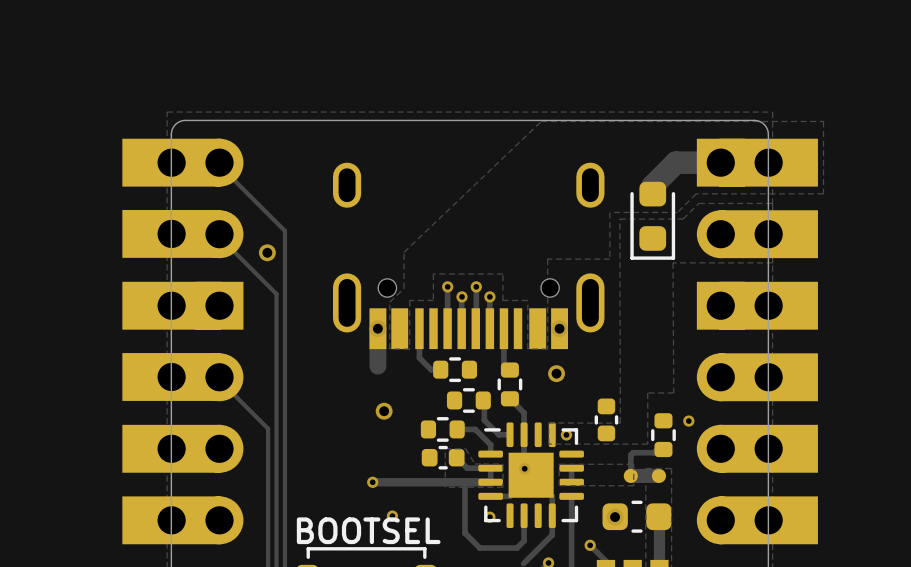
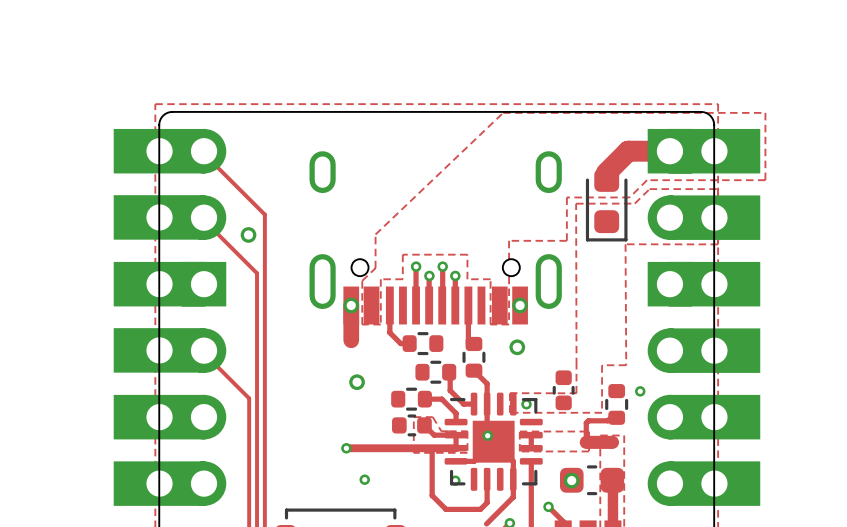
text: BOOTSEL (368, 530) -> none

